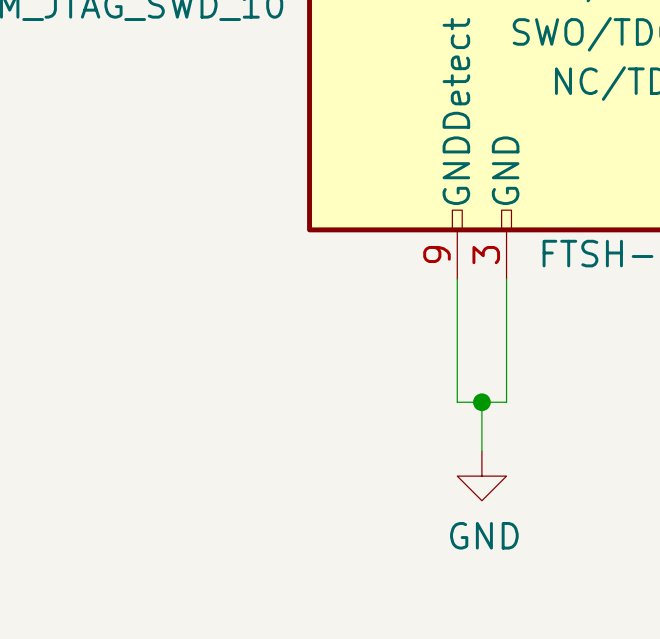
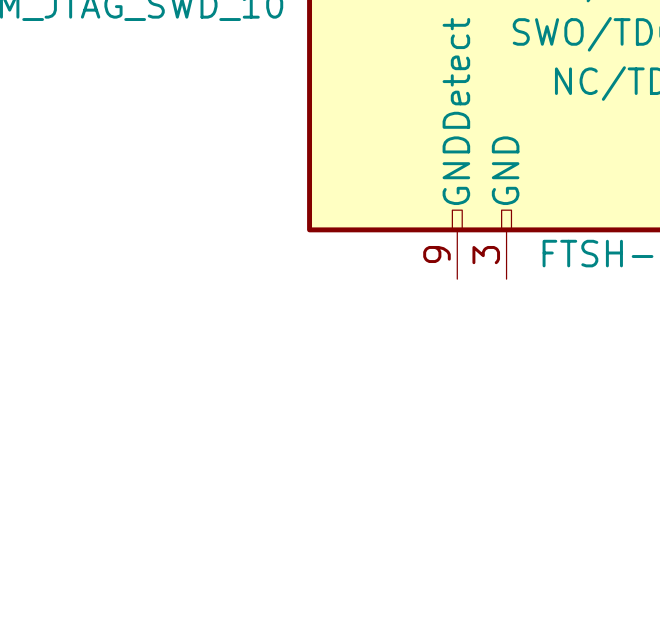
wire: (457, 279) (457, 402) (506, 402) (506, 279) -> none
wire: (481, 402) (481, 451) -> none
junction: (481, 402) -> none
power symbol: GND (481, 476) -> none

